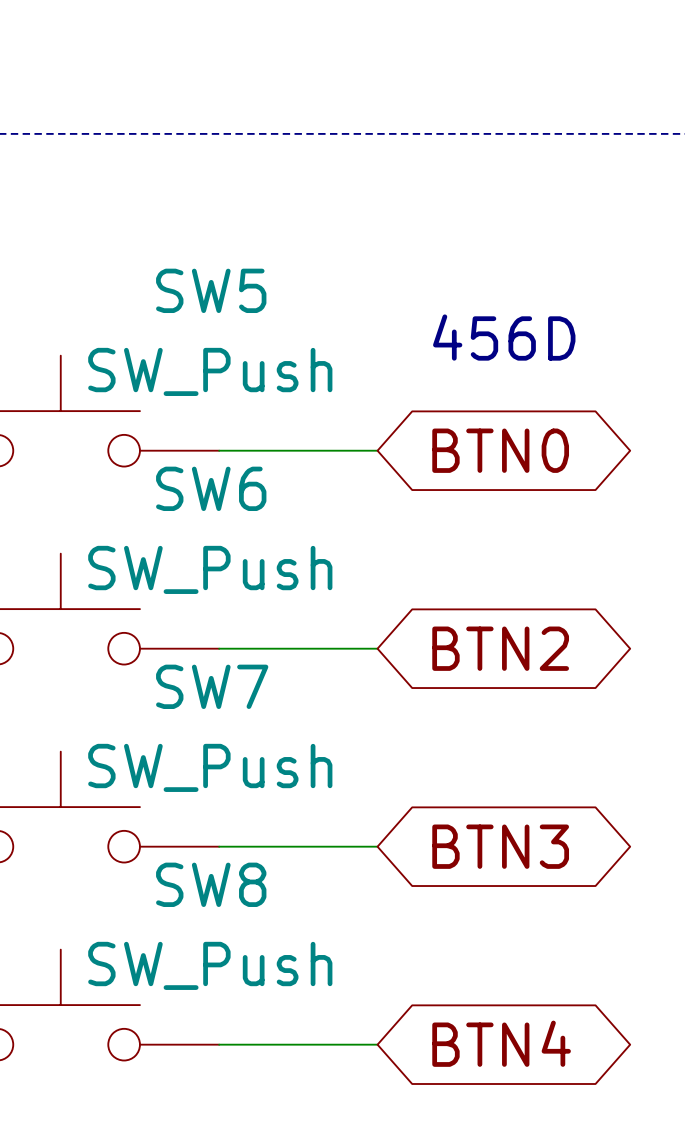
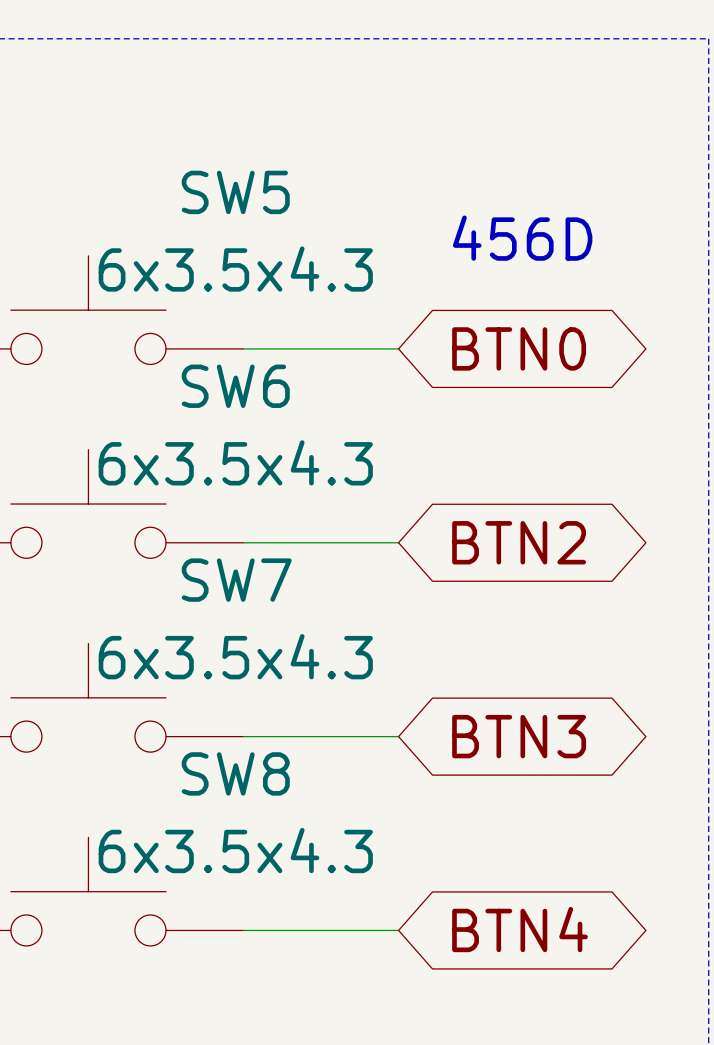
SW5 value: SW_Push (210, 371) -> 6x3.5x4.3 (235, 269)
SW6 value: SW_Push (210, 569) -> 6x3.5x4.3 (235, 462)
SW7 value: SW_Push (210, 767) -> 6x3.5x4.3 (235, 656)
SW8 value: SW_Push (210, 965) -> 6x3.5x4.3 (235, 850)

